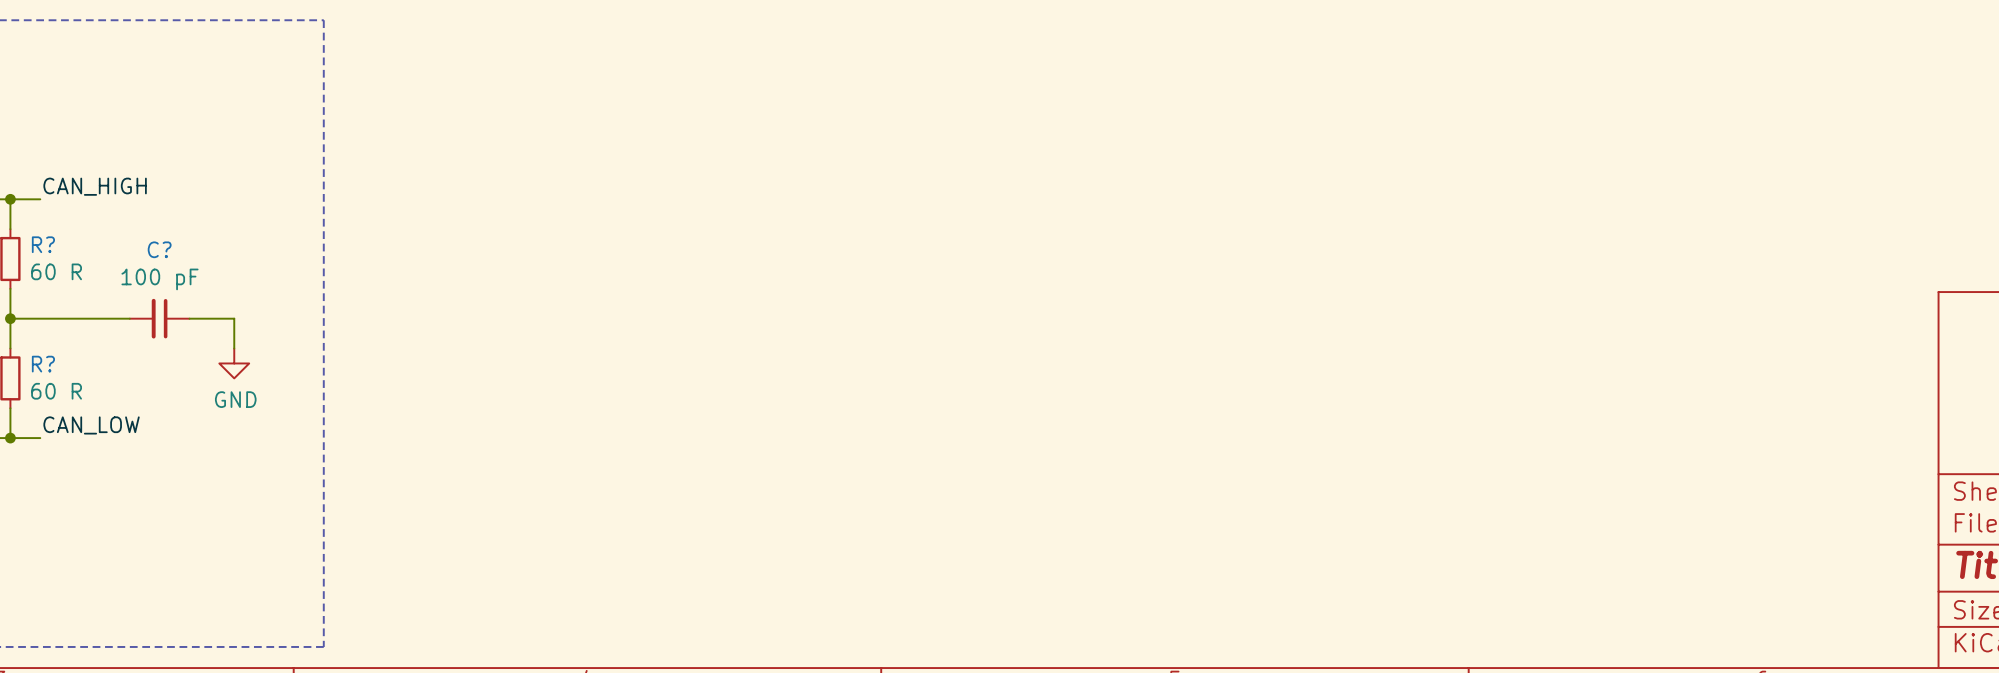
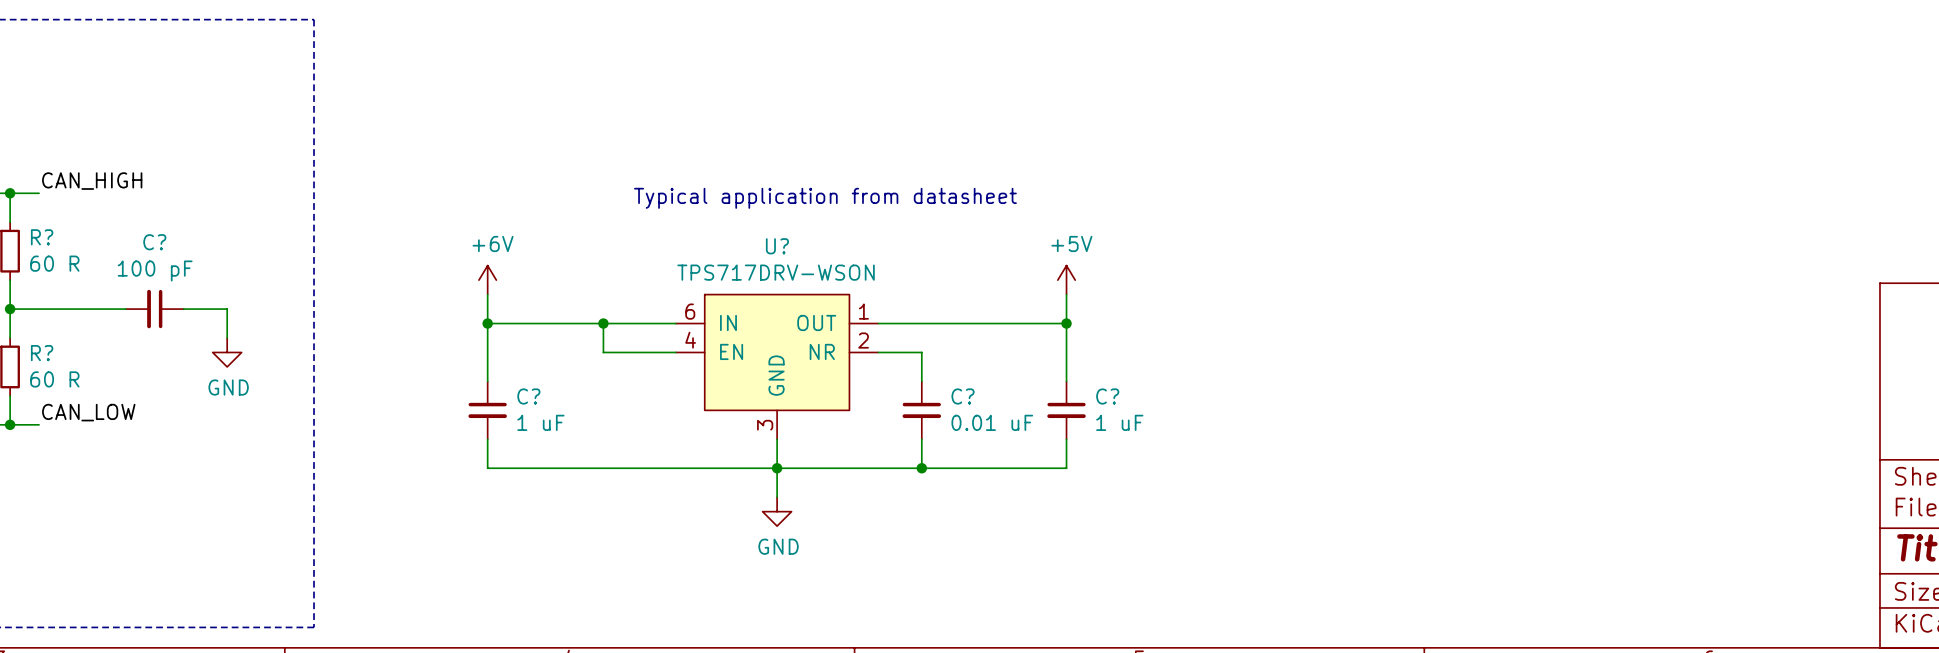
text: none -> Typical application from datasheet (825, 198)
power symbol: none -> +6V (487, 280)
power symbol: none -> +5V (1066, 280)
wire: none -> (487, 294) (487, 381)
wire: none -> (1066, 294) (1066, 381)
wire: none -> (487, 323) (675, 323)
junction: none -> (487, 323)
wire: none -> (603, 323) (603, 352) (675, 352)
junction: none -> (603, 323)
wire: none -> (878, 323) (1066, 323)
junction: none -> (1066, 323)
wire: none -> (878, 352) (921, 352) (921, 381)
U?: none -> TPS717DRV-WSON (777, 366)
C?: none -> 1 uF (487, 410)
C?: none -> 0.01 uF (921, 410)
C?: none -> 1 uF (1066, 410)
wire: none -> (487, 439) (487, 468) (1066, 468) (1066, 439)
wire: none -> (777, 439) (777, 497)
wire: none -> (921, 439) (921, 468)
junction: none -> (777, 468)
junction: none -> (921, 468)
power symbol: none -> GND (777, 511)

